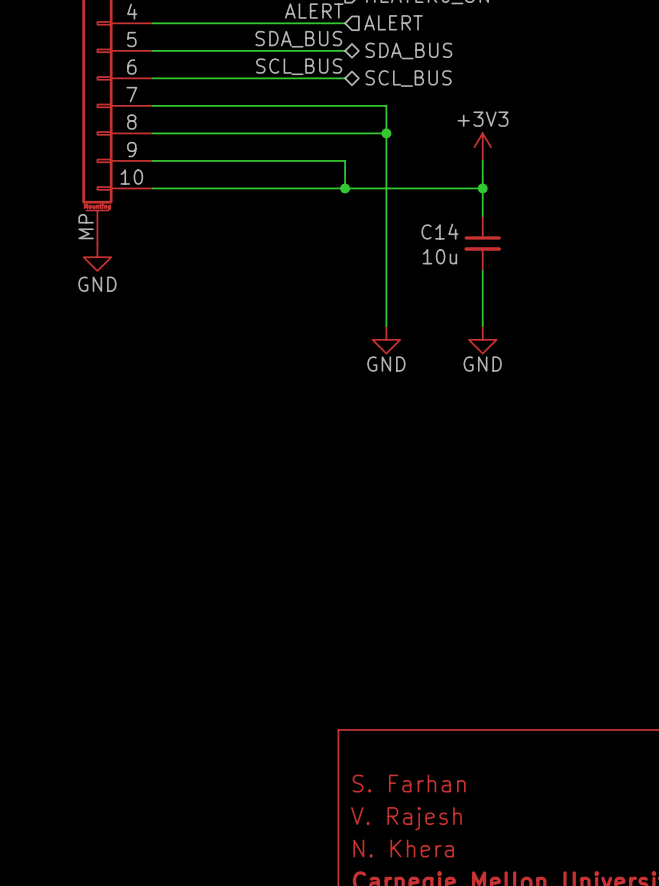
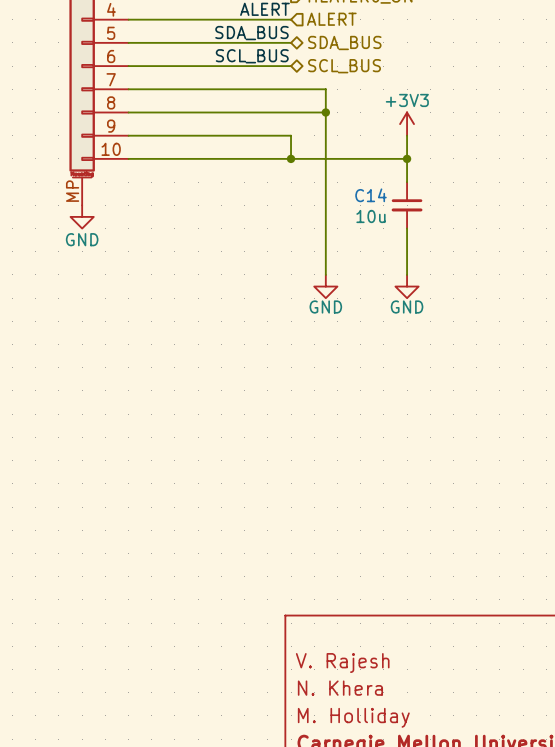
title block: S. Farhan (409, 783) -> V. Rajesh (342, 663)
title block: V. Rajesh (406, 818) -> N. Khera (340, 688)
title block: N. Khera (403, 848) -> M. Holliday (353, 717)

